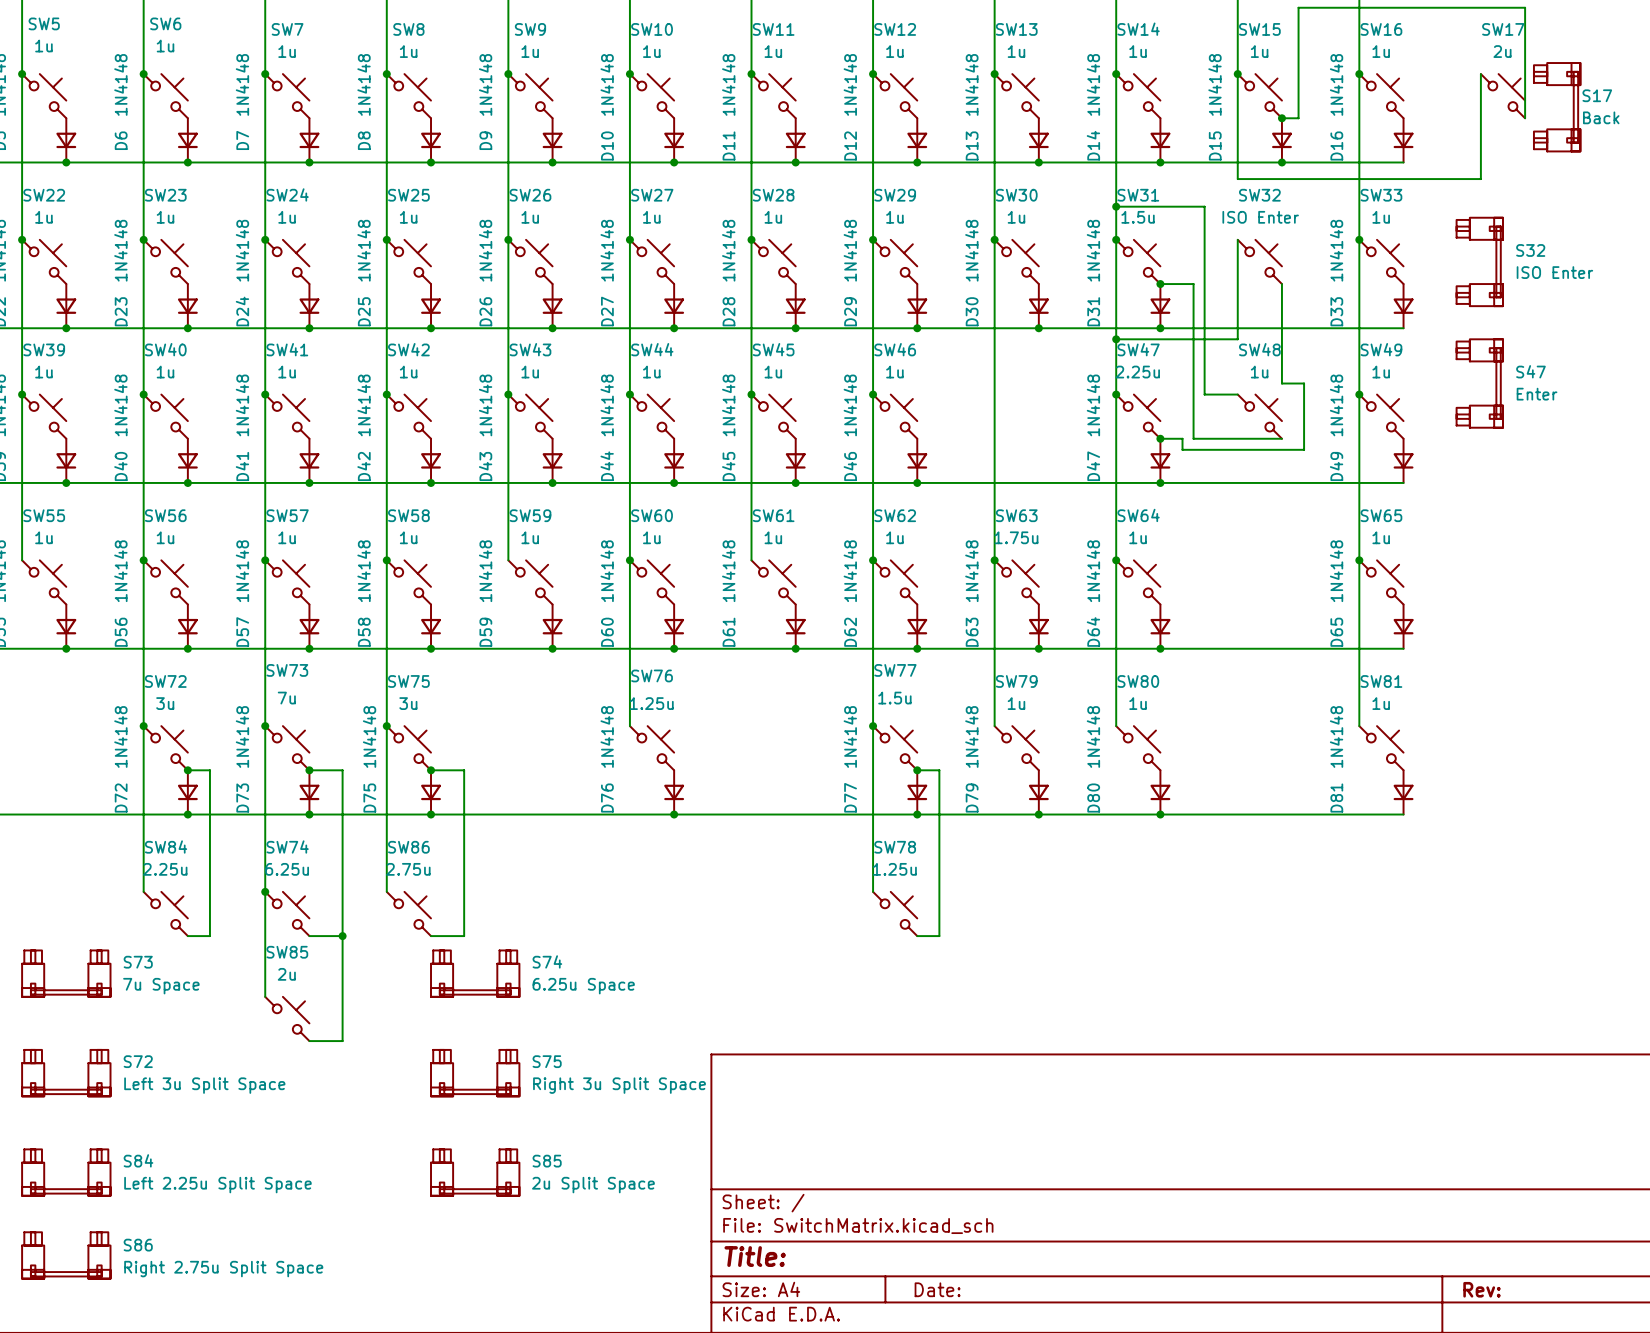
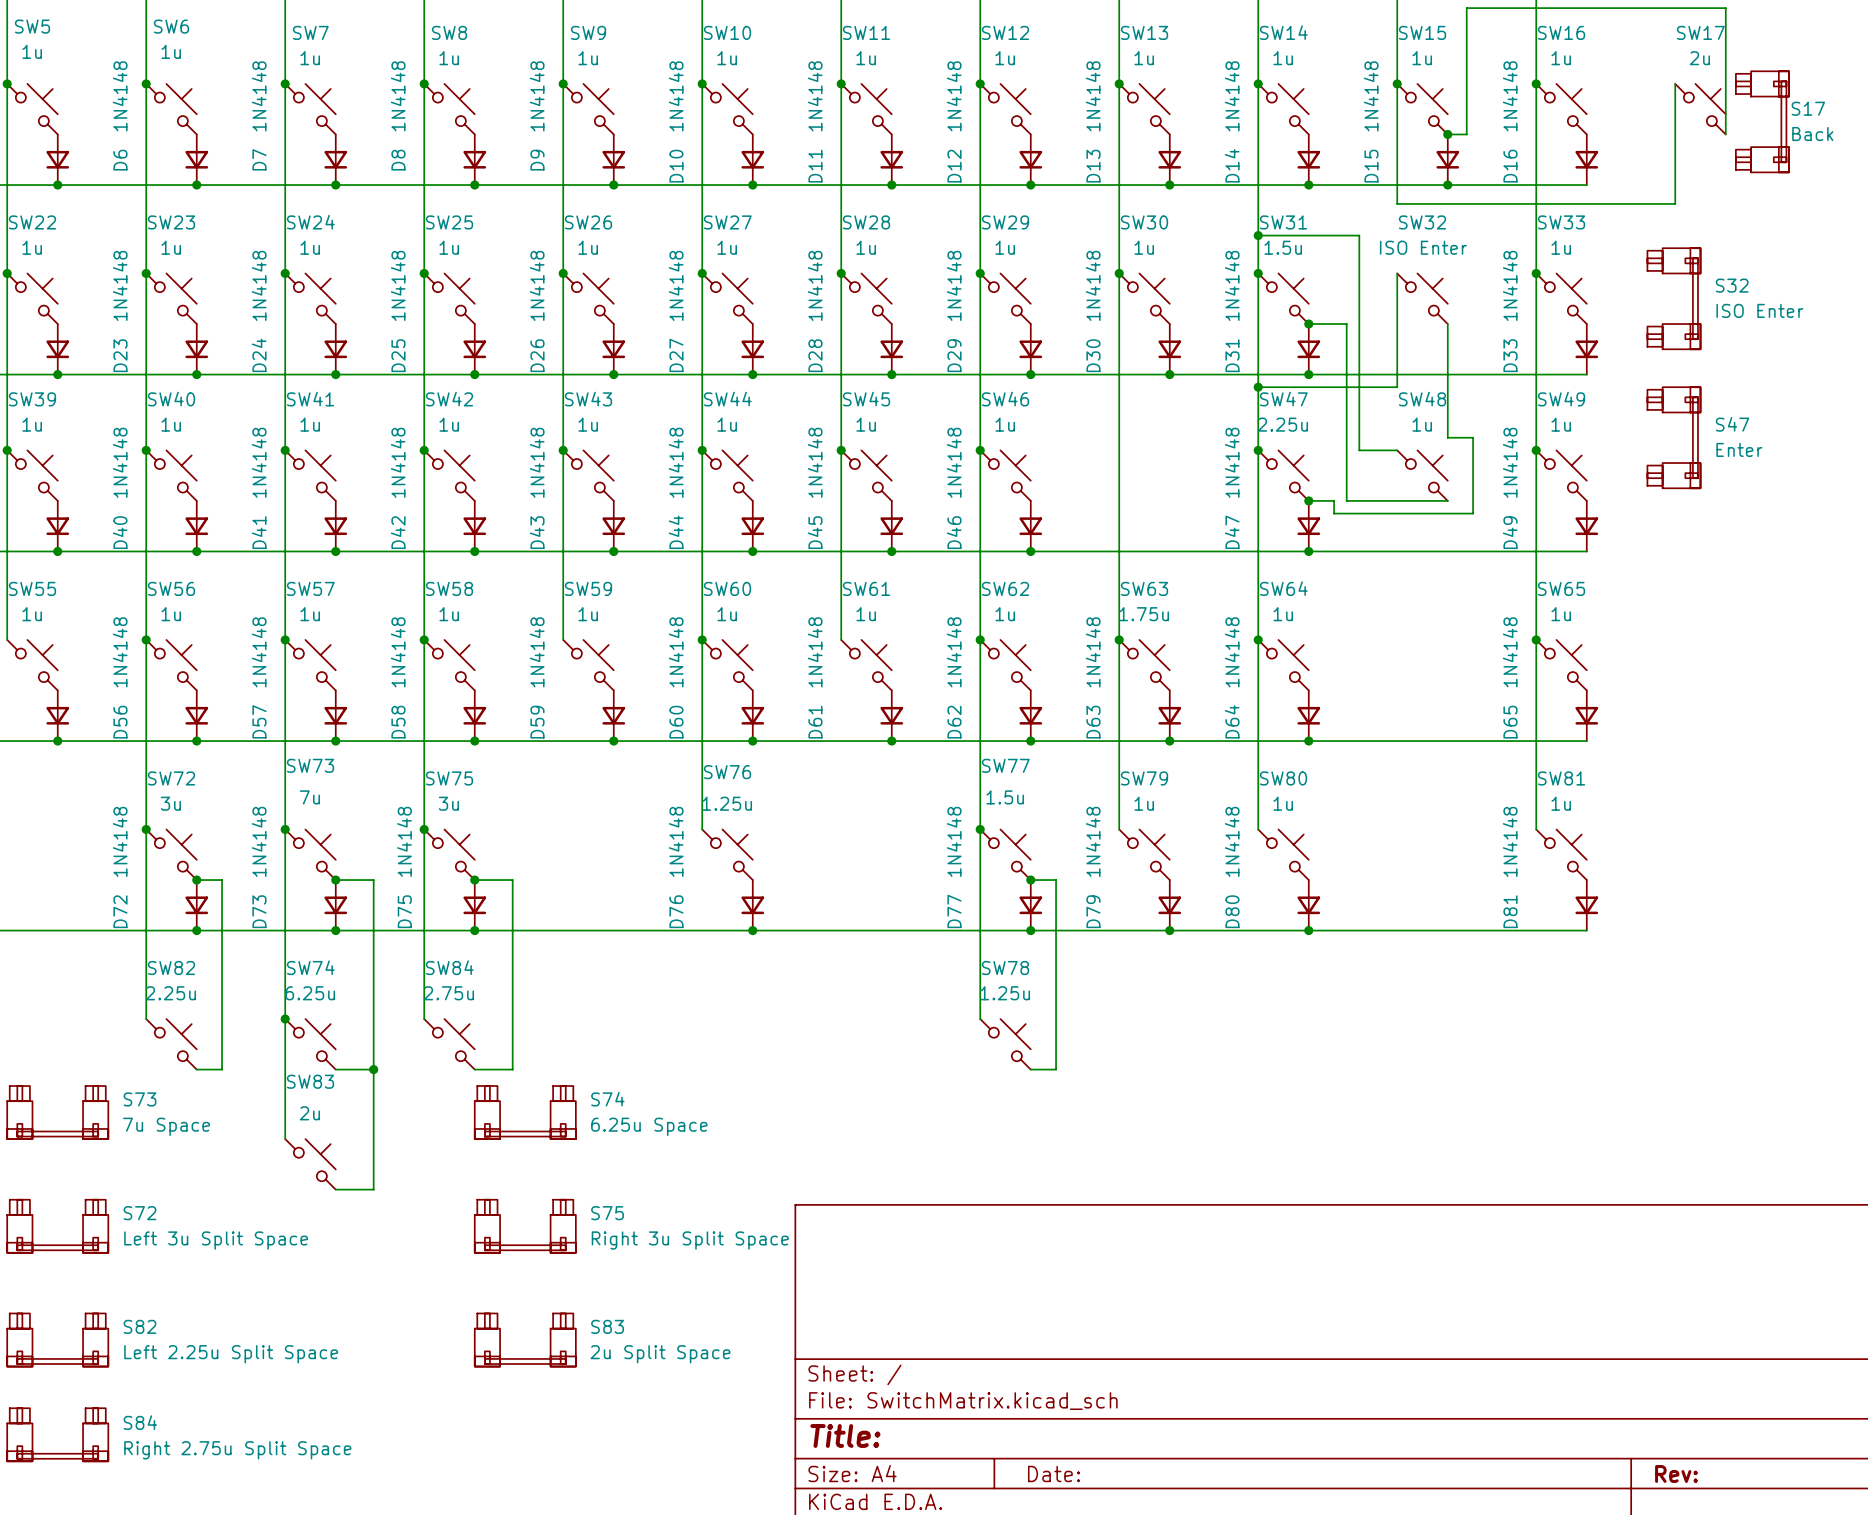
SW84 name: SW84 (166, 847) -> SW82 (171, 968)
SW86 name: SW86 (408, 847) -> SW84 (449, 967)
SW85 name: SW85 (287, 952) -> SW83 (310, 1081)
S84 name: S84 (138, 1160) -> S82 (139, 1326)
S85 name: S85 (547, 1161) -> S83 (607, 1326)
S86 name: S86 (138, 1245) -> S84 (140, 1422)

